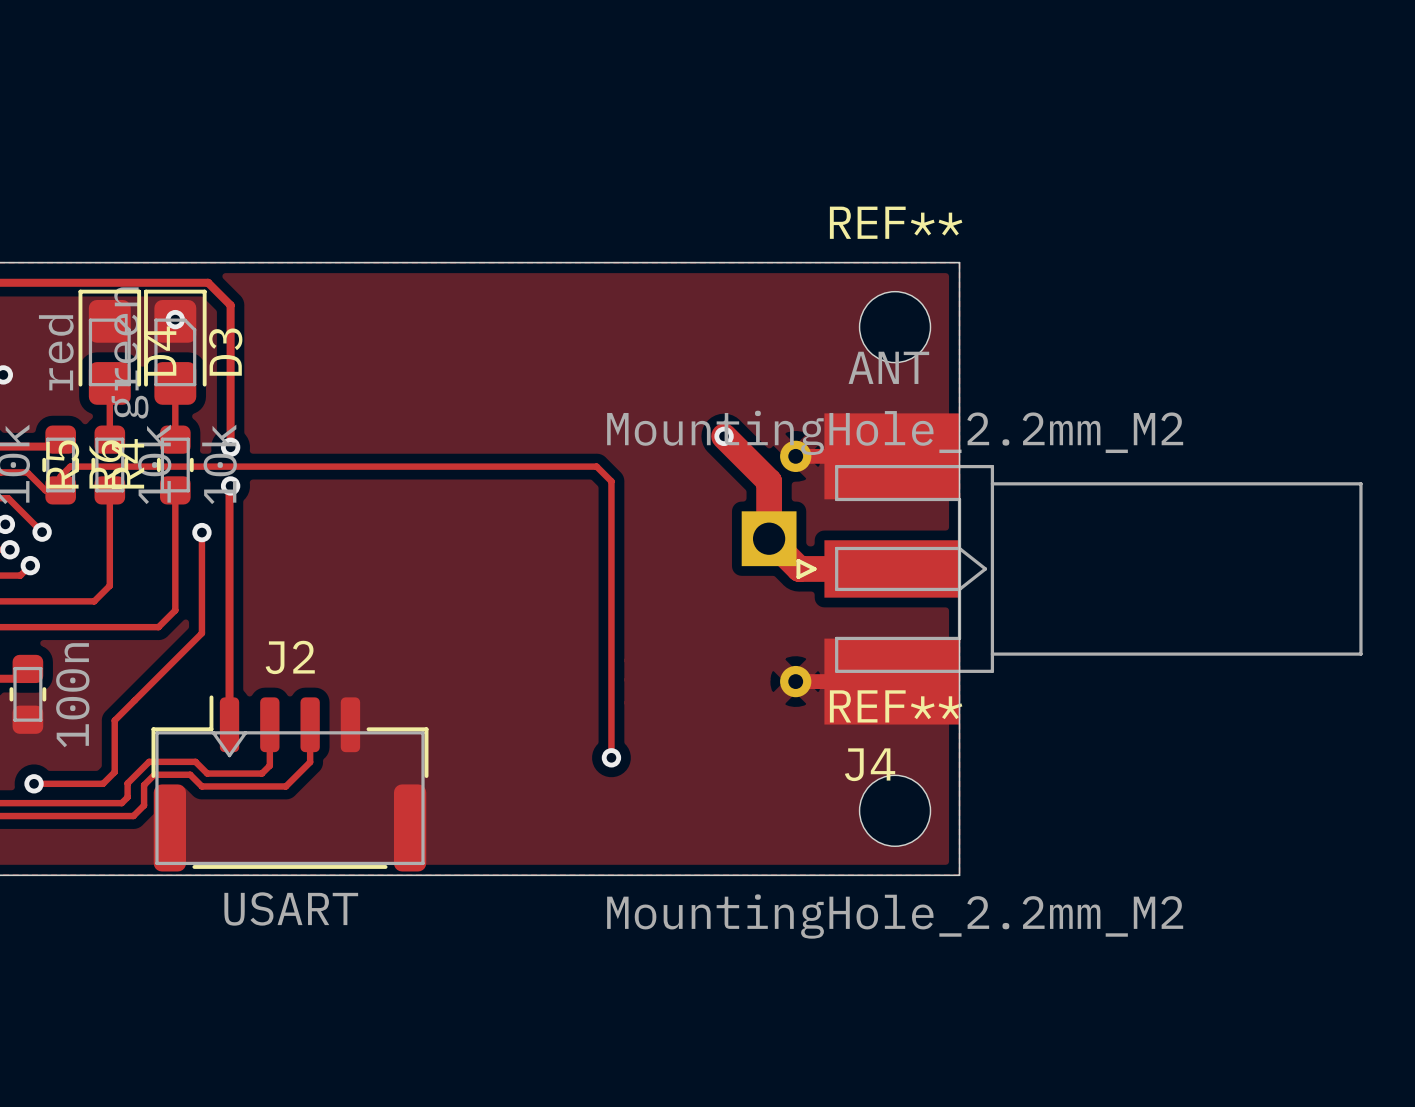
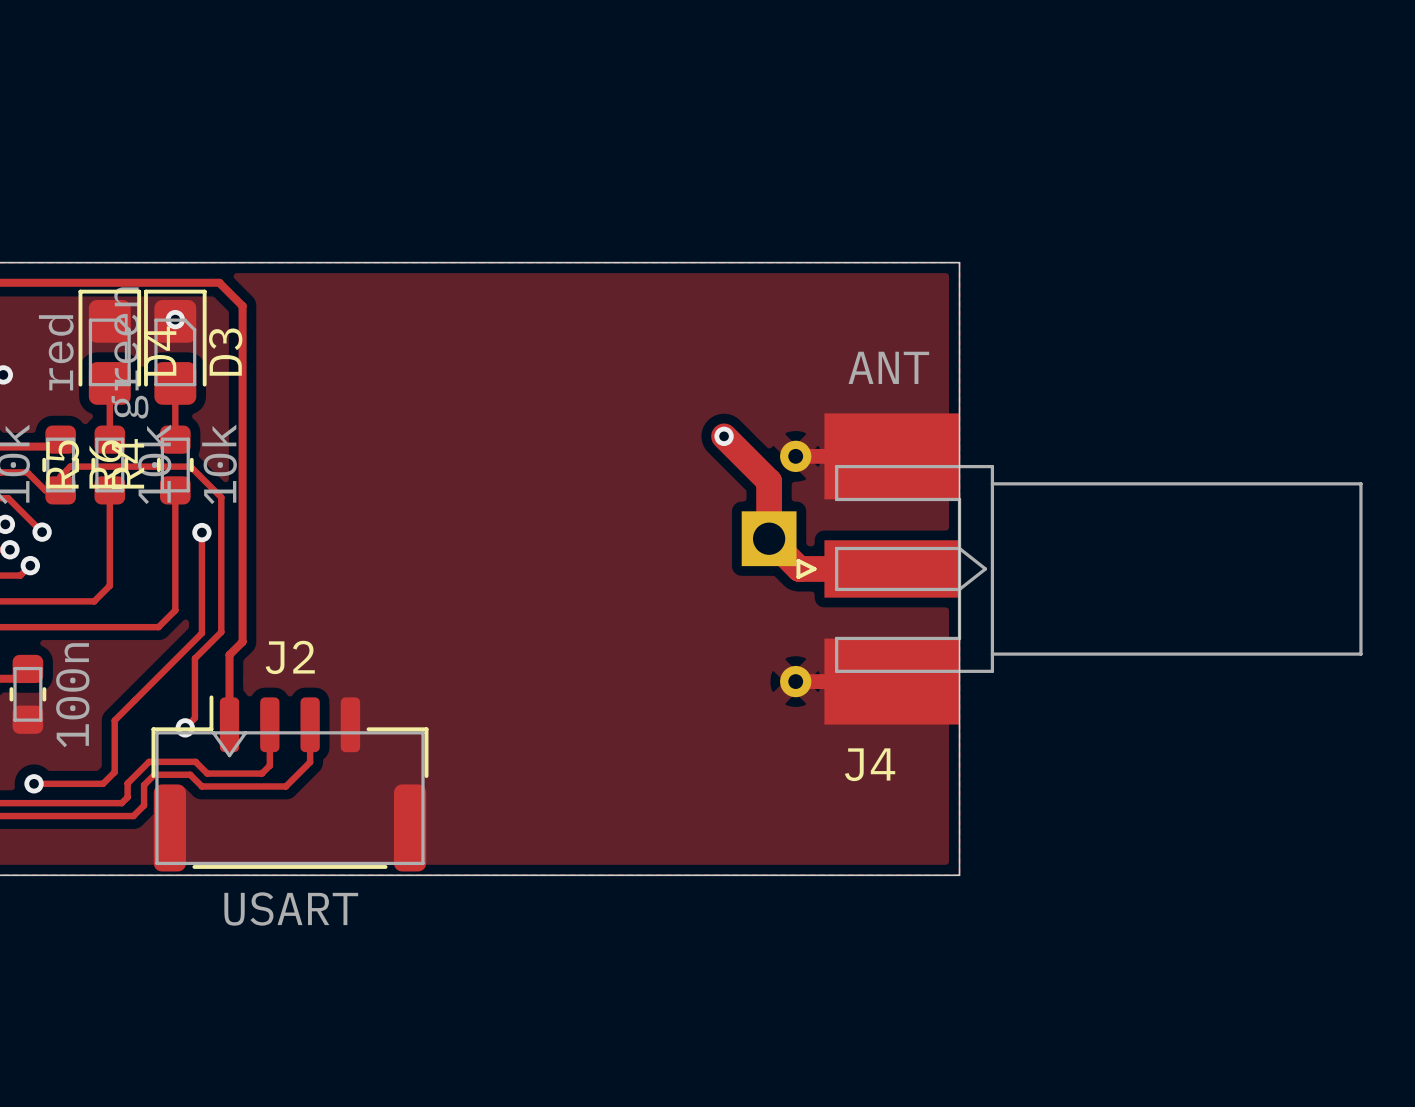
track: (208, 282) (230, 305) (230, 447) -> none
REF**: MountingHole_2.2mm_M2 (895, 327) -> none
via: (230, 447) -> none
track: (190, 466) (596, 466) (611, 481) (611, 757) -> (190, 466) (221, 497) (221, 632) (194, 658) (194, 718) (185, 727)
track: (230, 485) (229, 654) -> (208, 282) (219, 282) (242, 306) (242, 641) (229, 654)
via: (230, 485) -> none
via: none -> (185, 727)
via: (611, 757) -> none
REF**: MountingHole_2.2mm_M2 (895, 810) -> none

